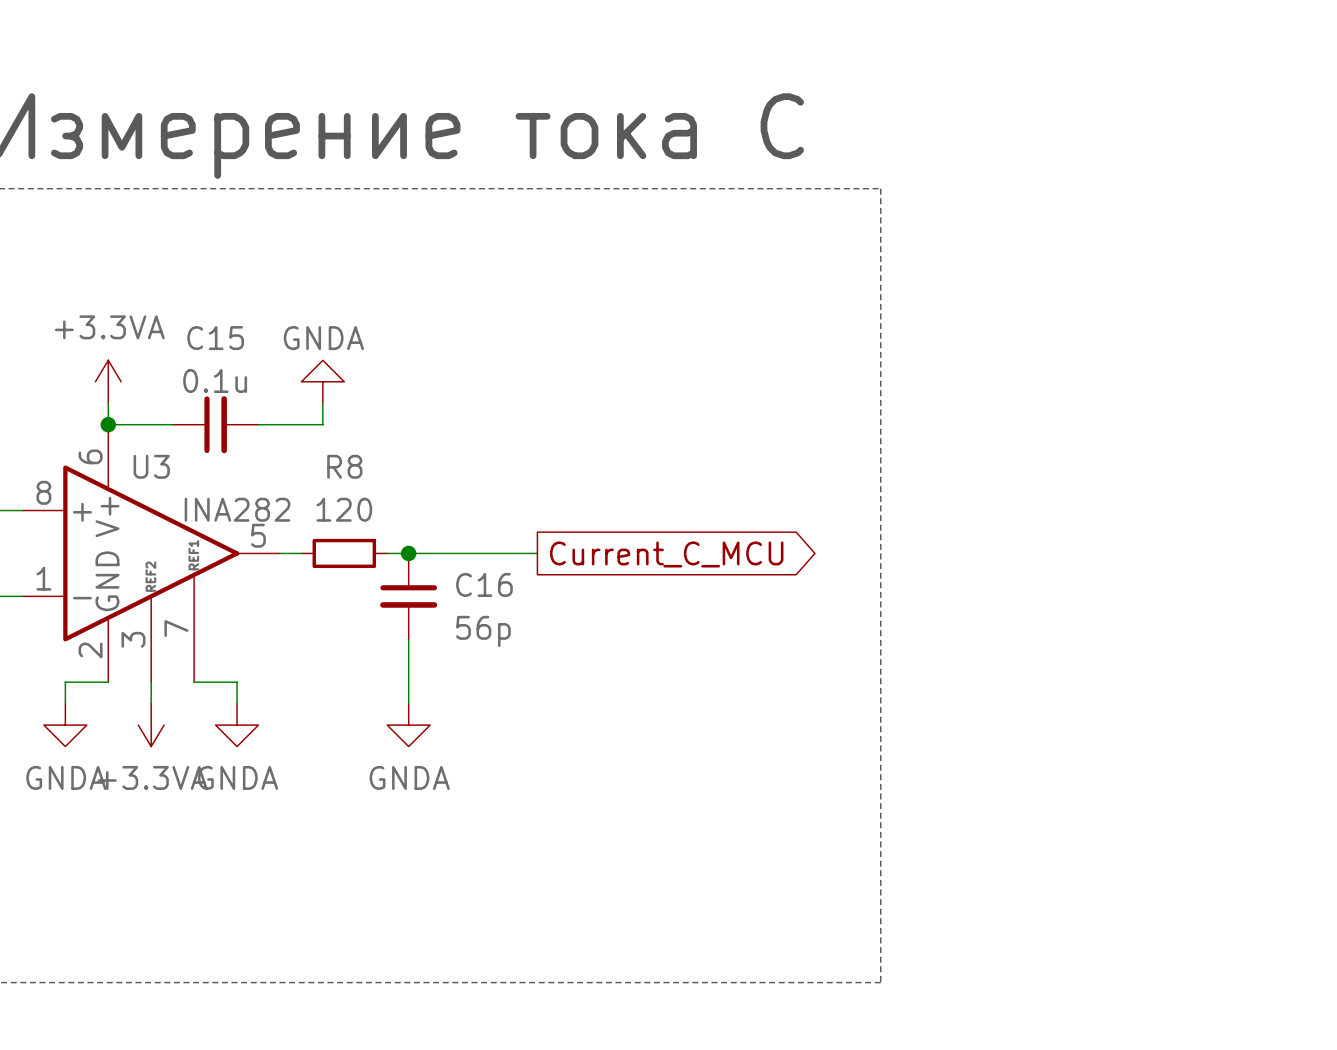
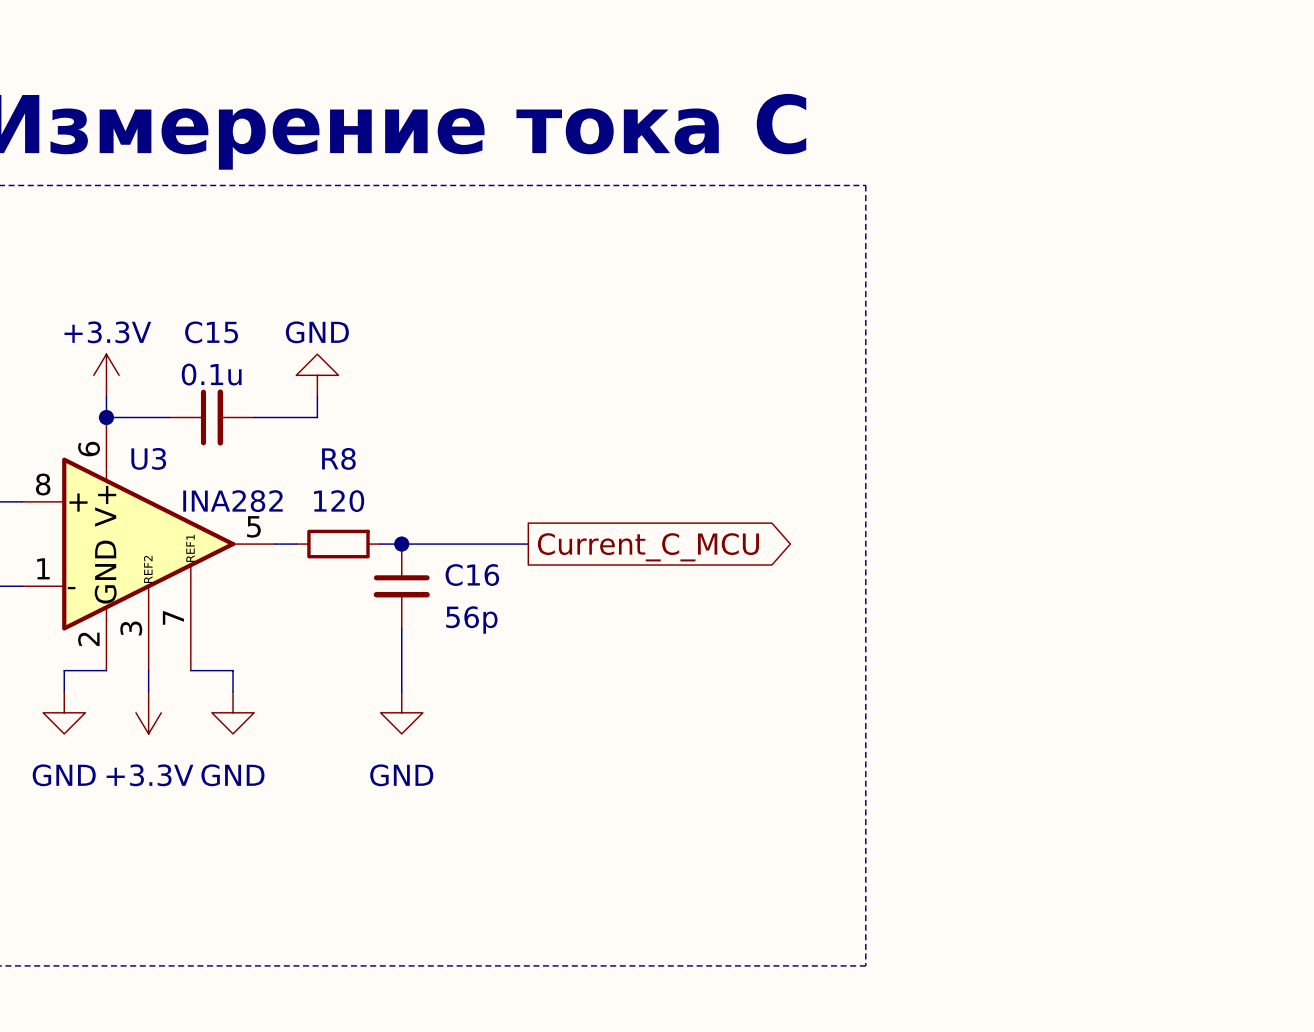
power symbol: +3.3VA (108, 381) -> +3.3V (106, 375)
power symbol: GNDA (322, 381) -> GND (317, 375)
power symbol: GNDA (65, 725) -> GND (64, 712)
power symbol: +3.3VA (151, 725) -> +3.3V (148, 712)
power symbol: GNDA (237, 725) -> GND (233, 712)
power symbol: GNDA (408, 725) -> GND (401, 712)

